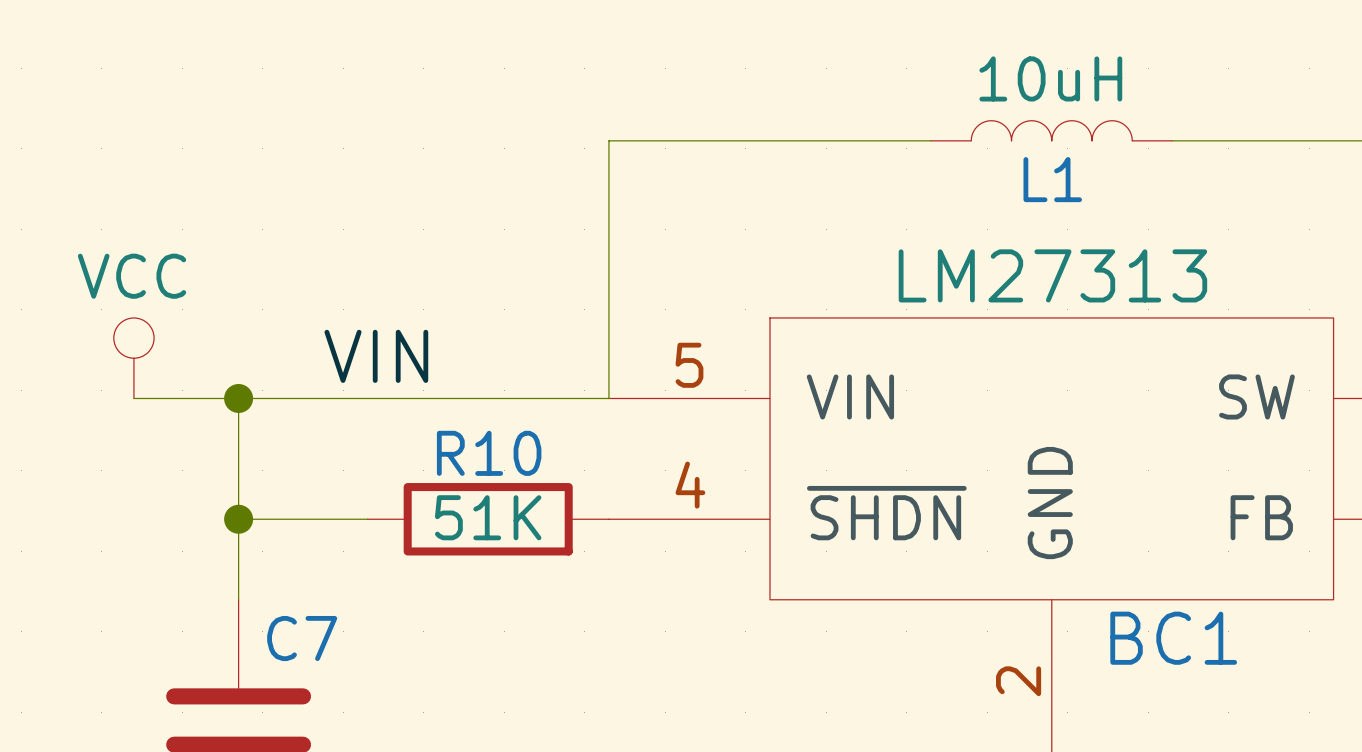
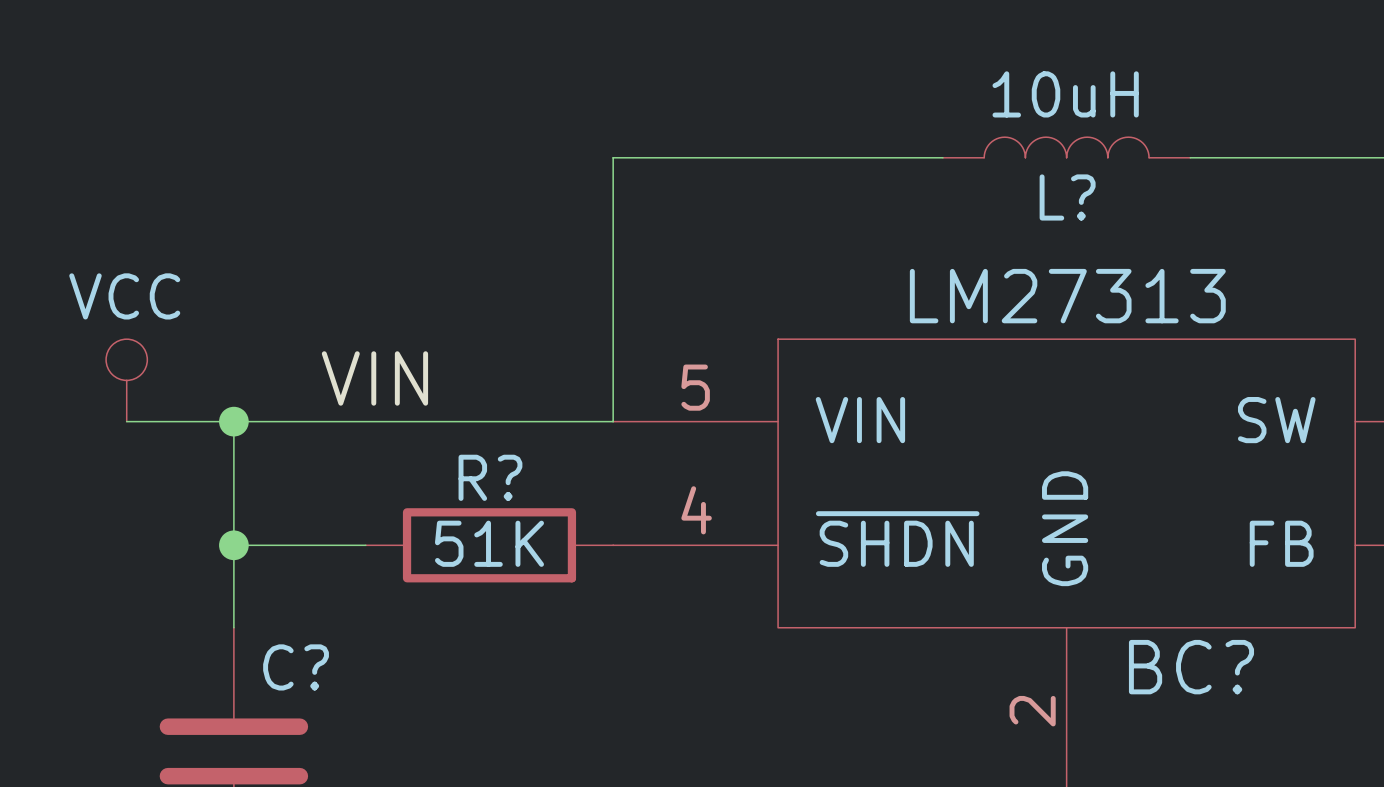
L1 name: L1 (1052, 179) -> L? (1067, 197)
R10 name: R10 (489, 453) -> R? (490, 477)
C7 name: C7 (302, 638) -> C? (296, 667)
BC1 name: BC1 (1173, 638) -> BC? (1191, 667)

